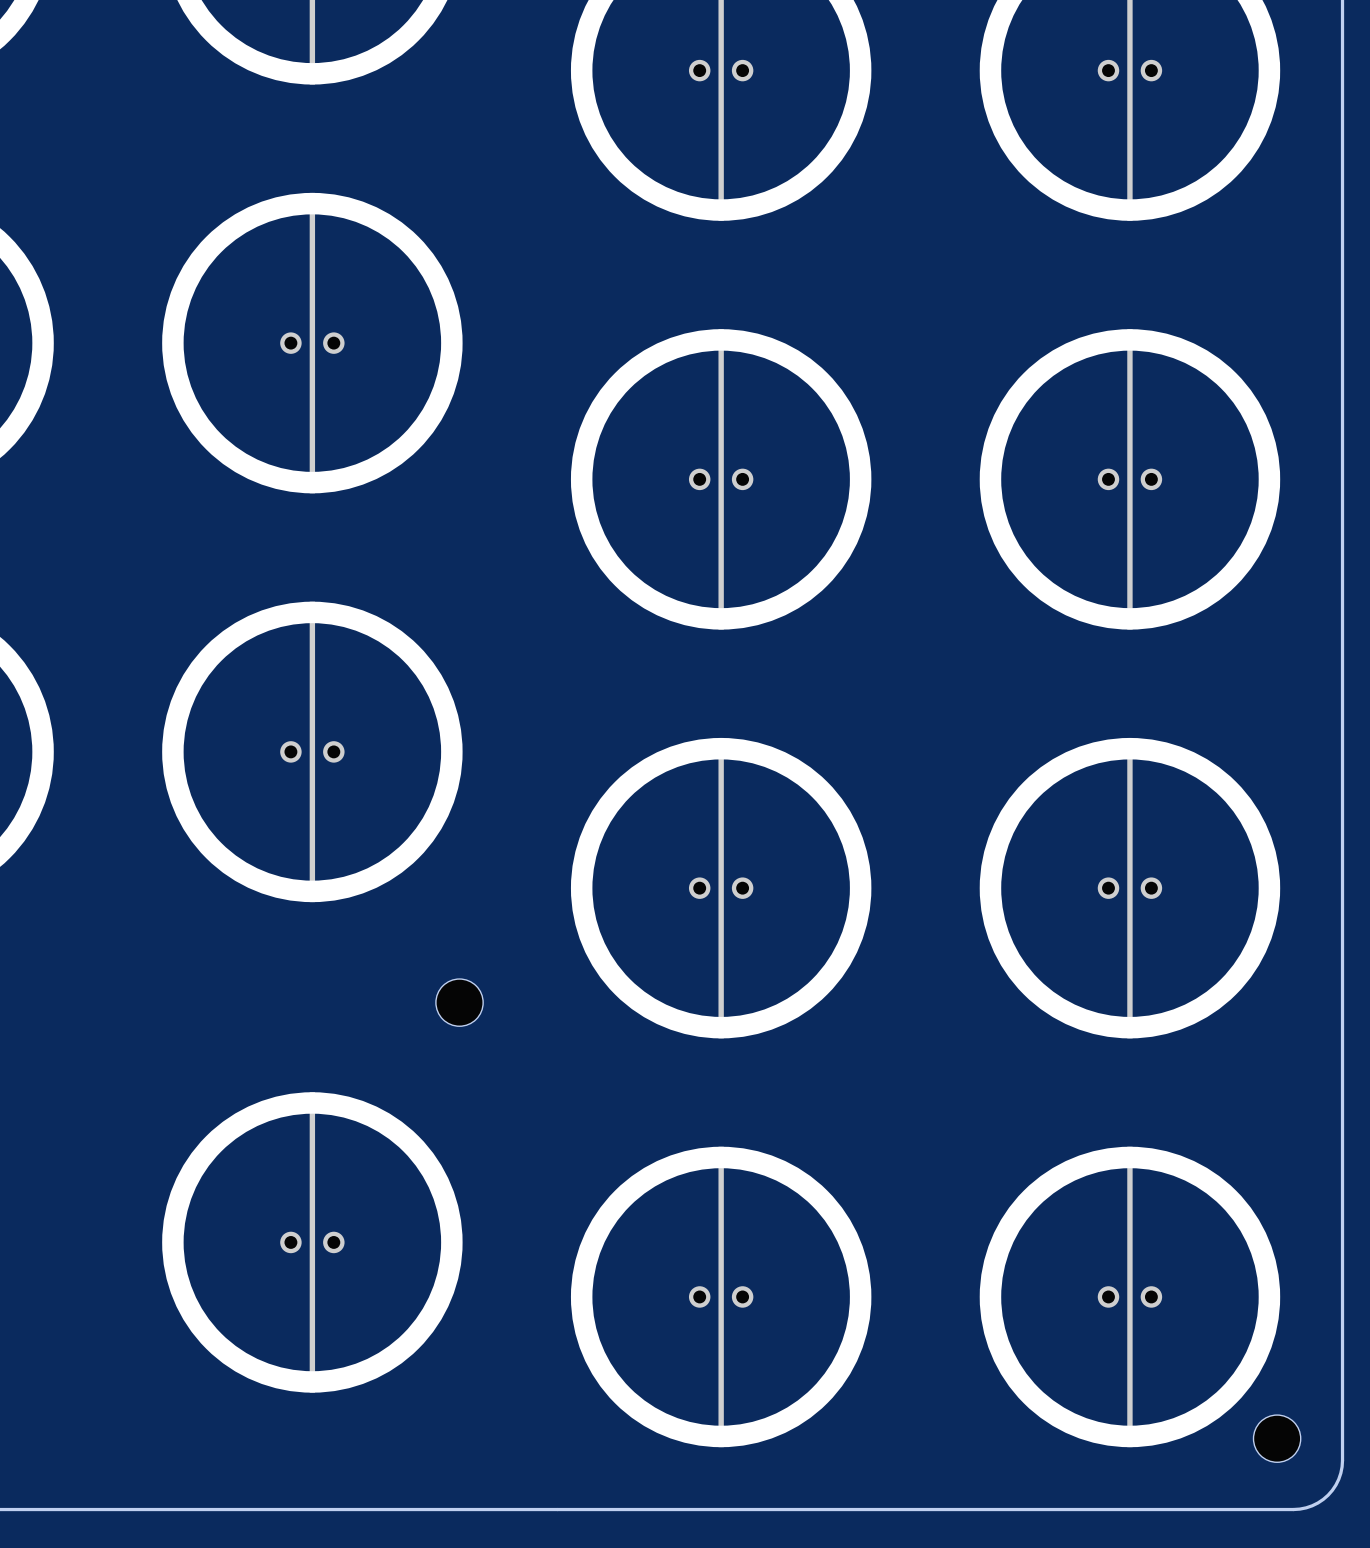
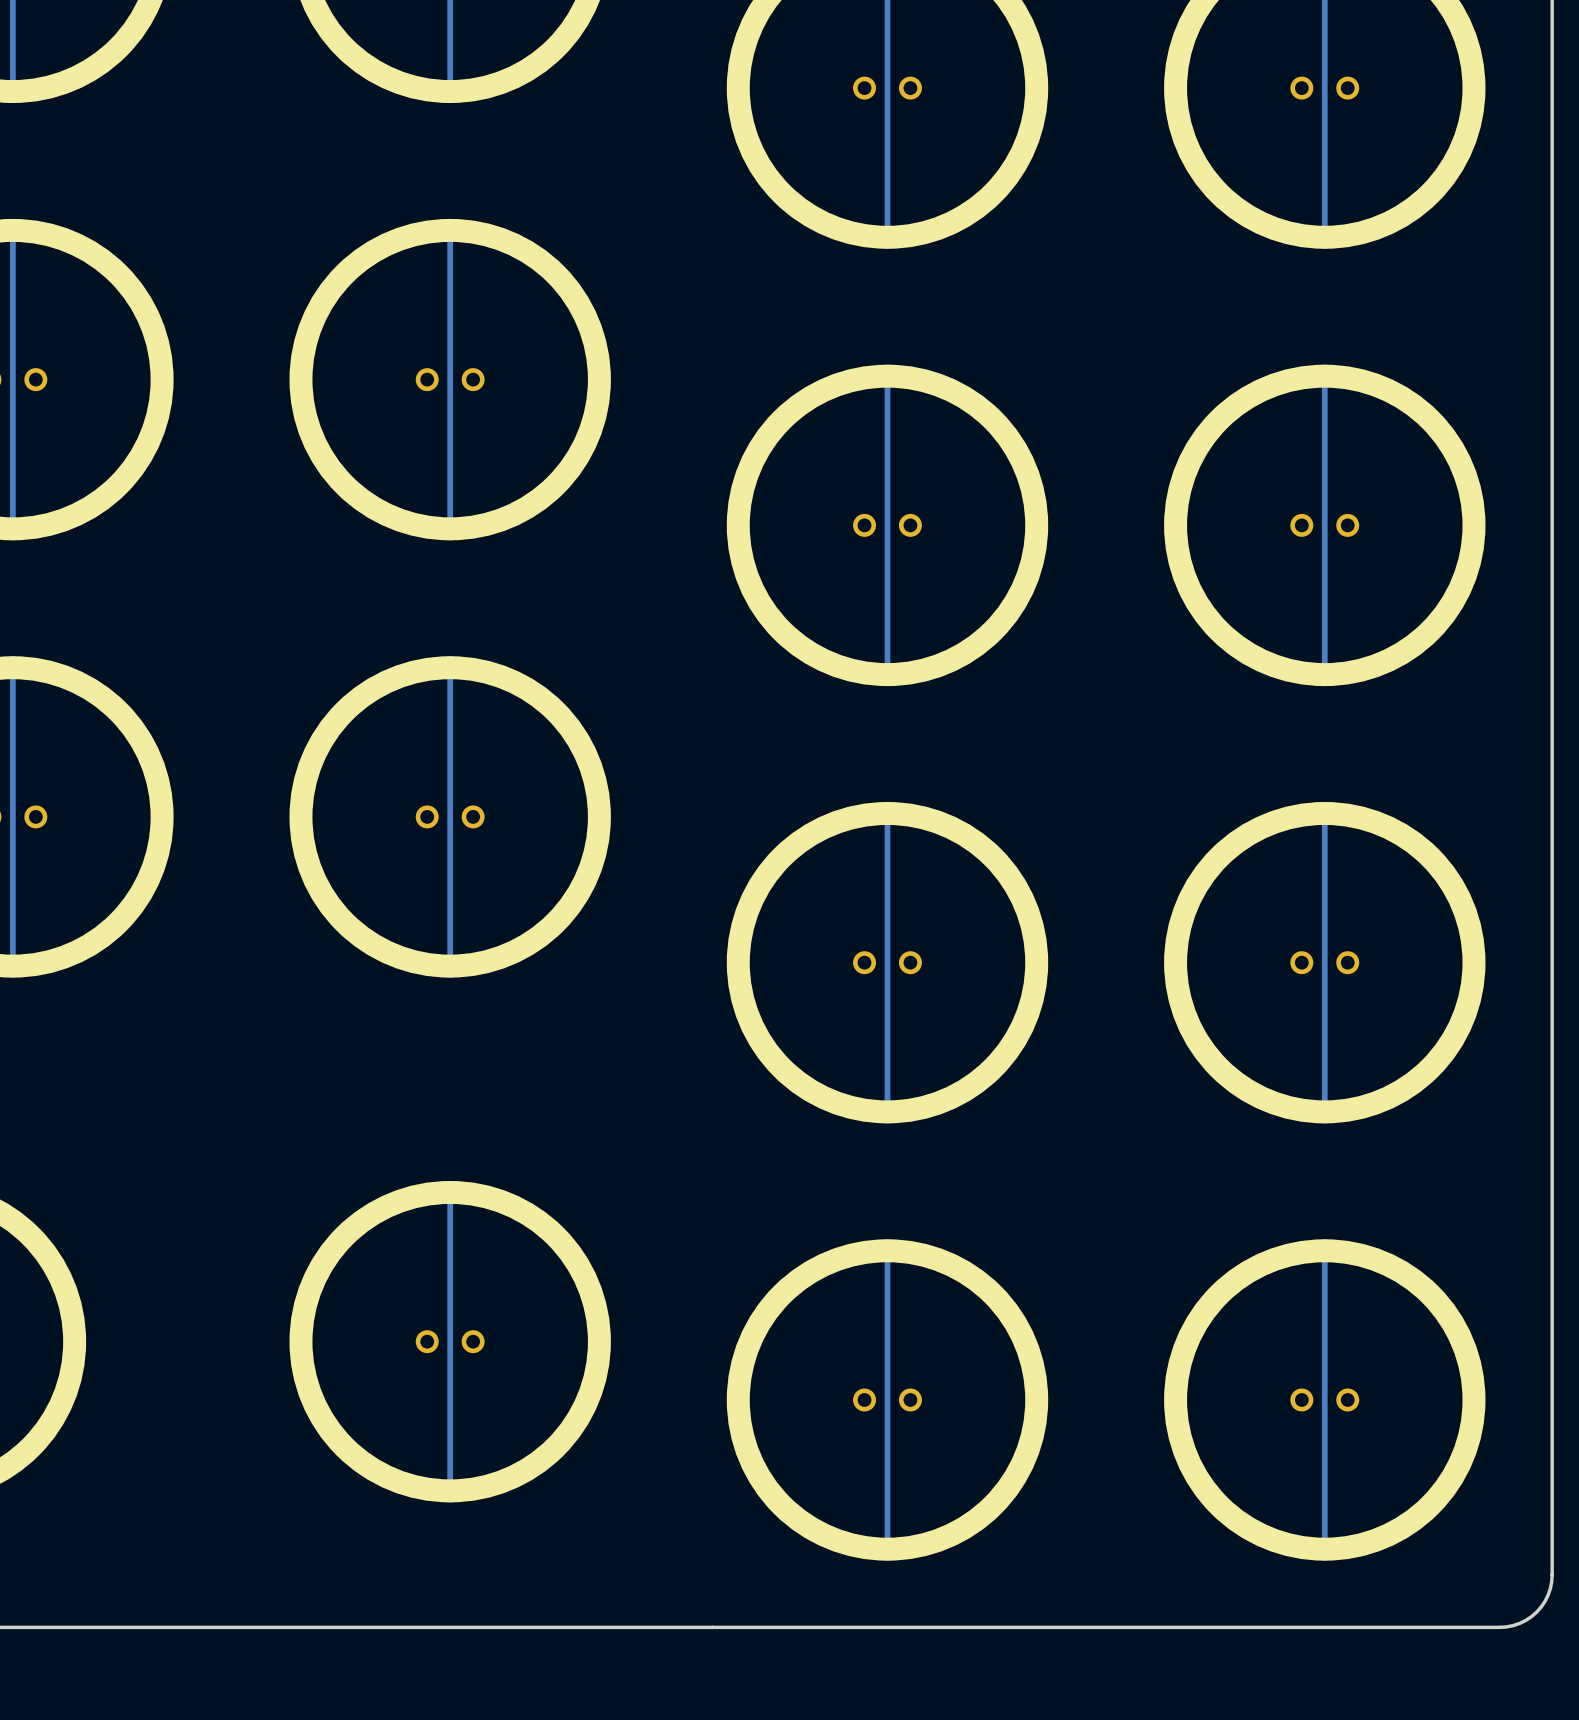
part: (459, 1002) -> none
part: (1277, 1438) -> none

